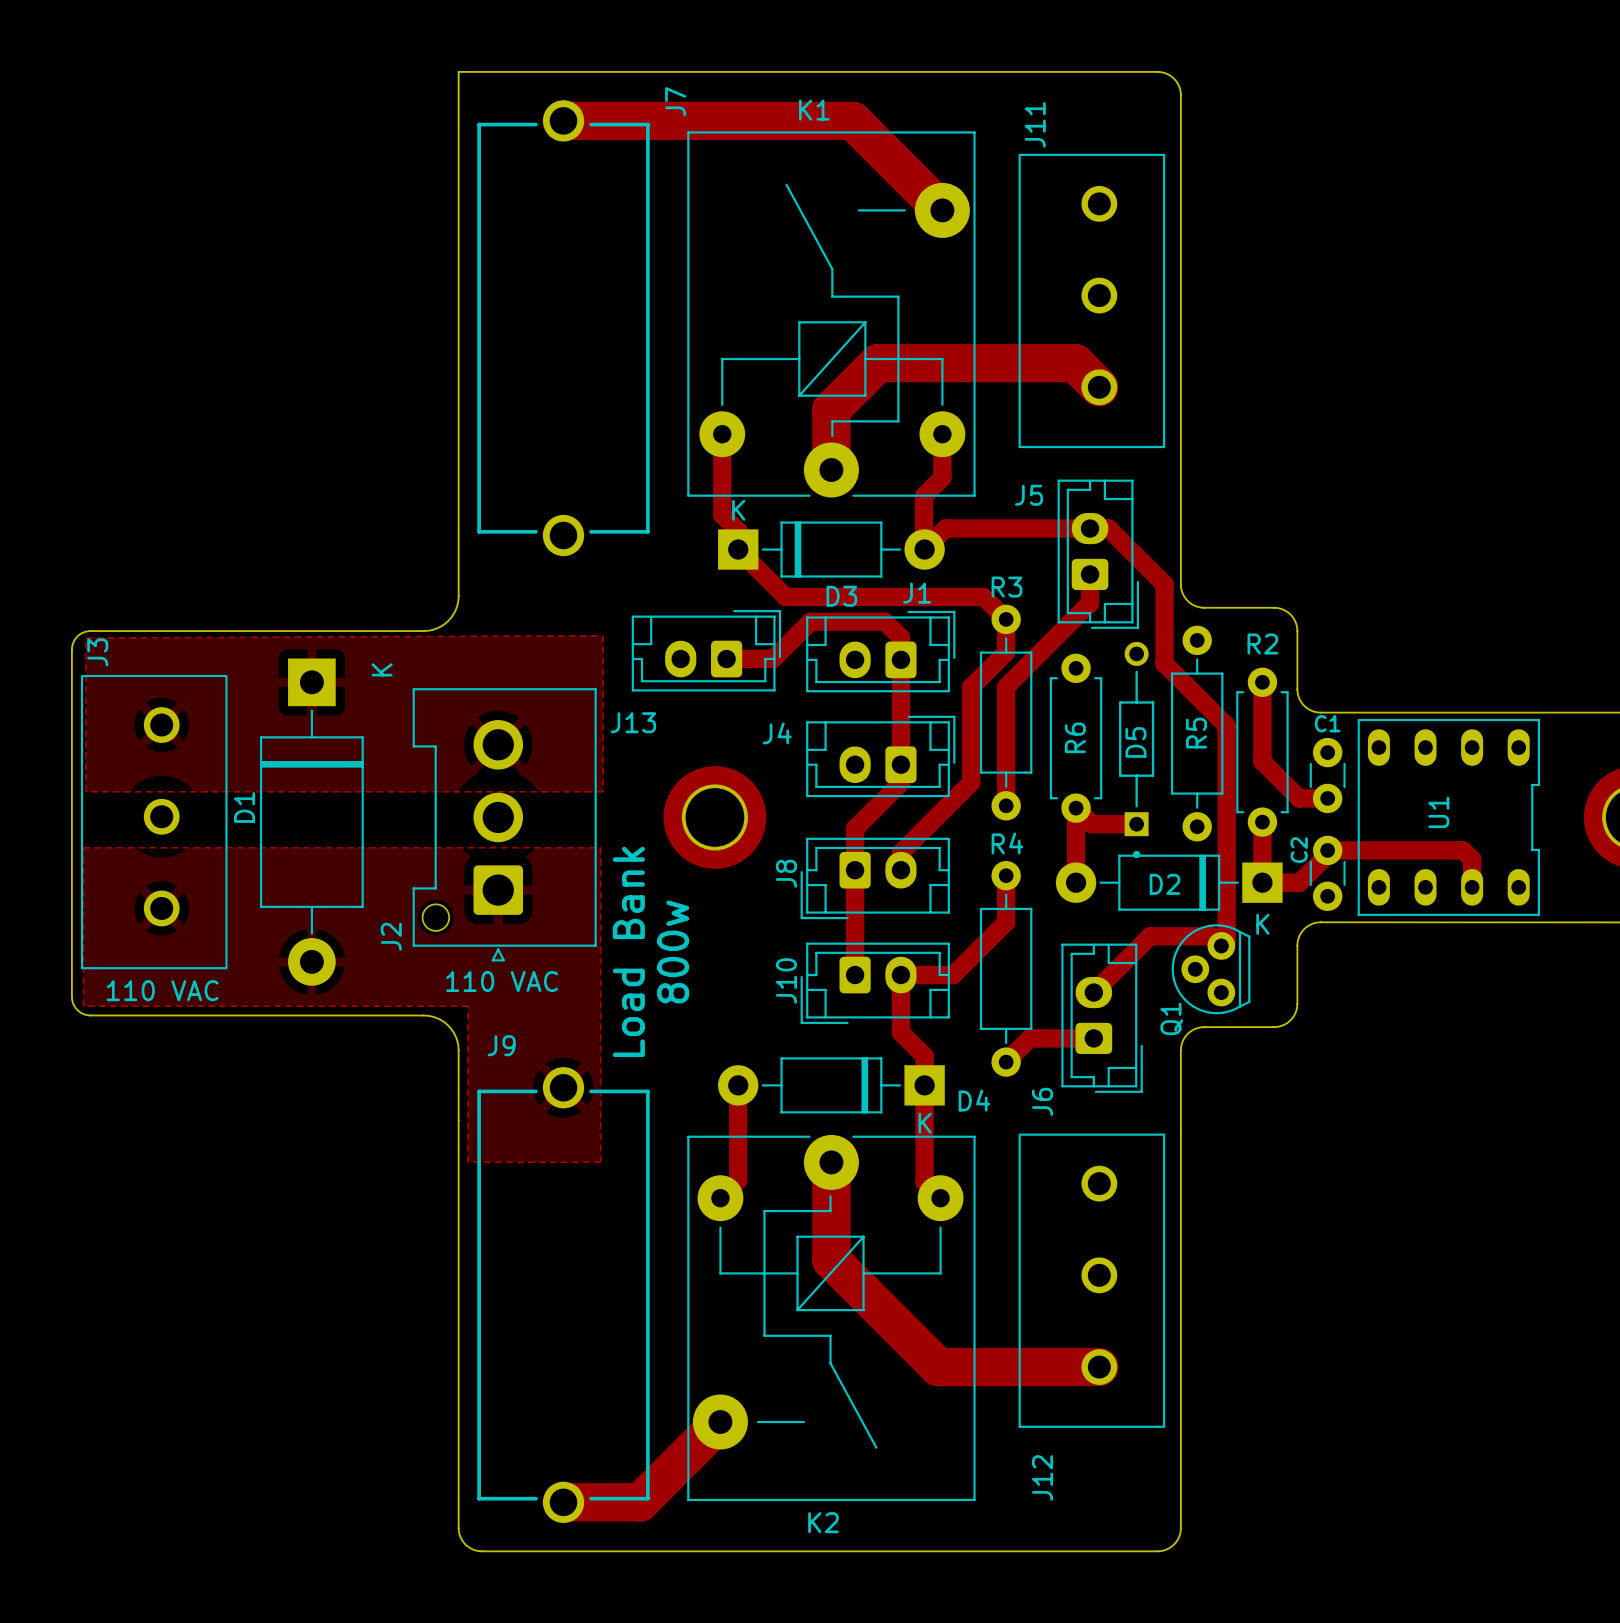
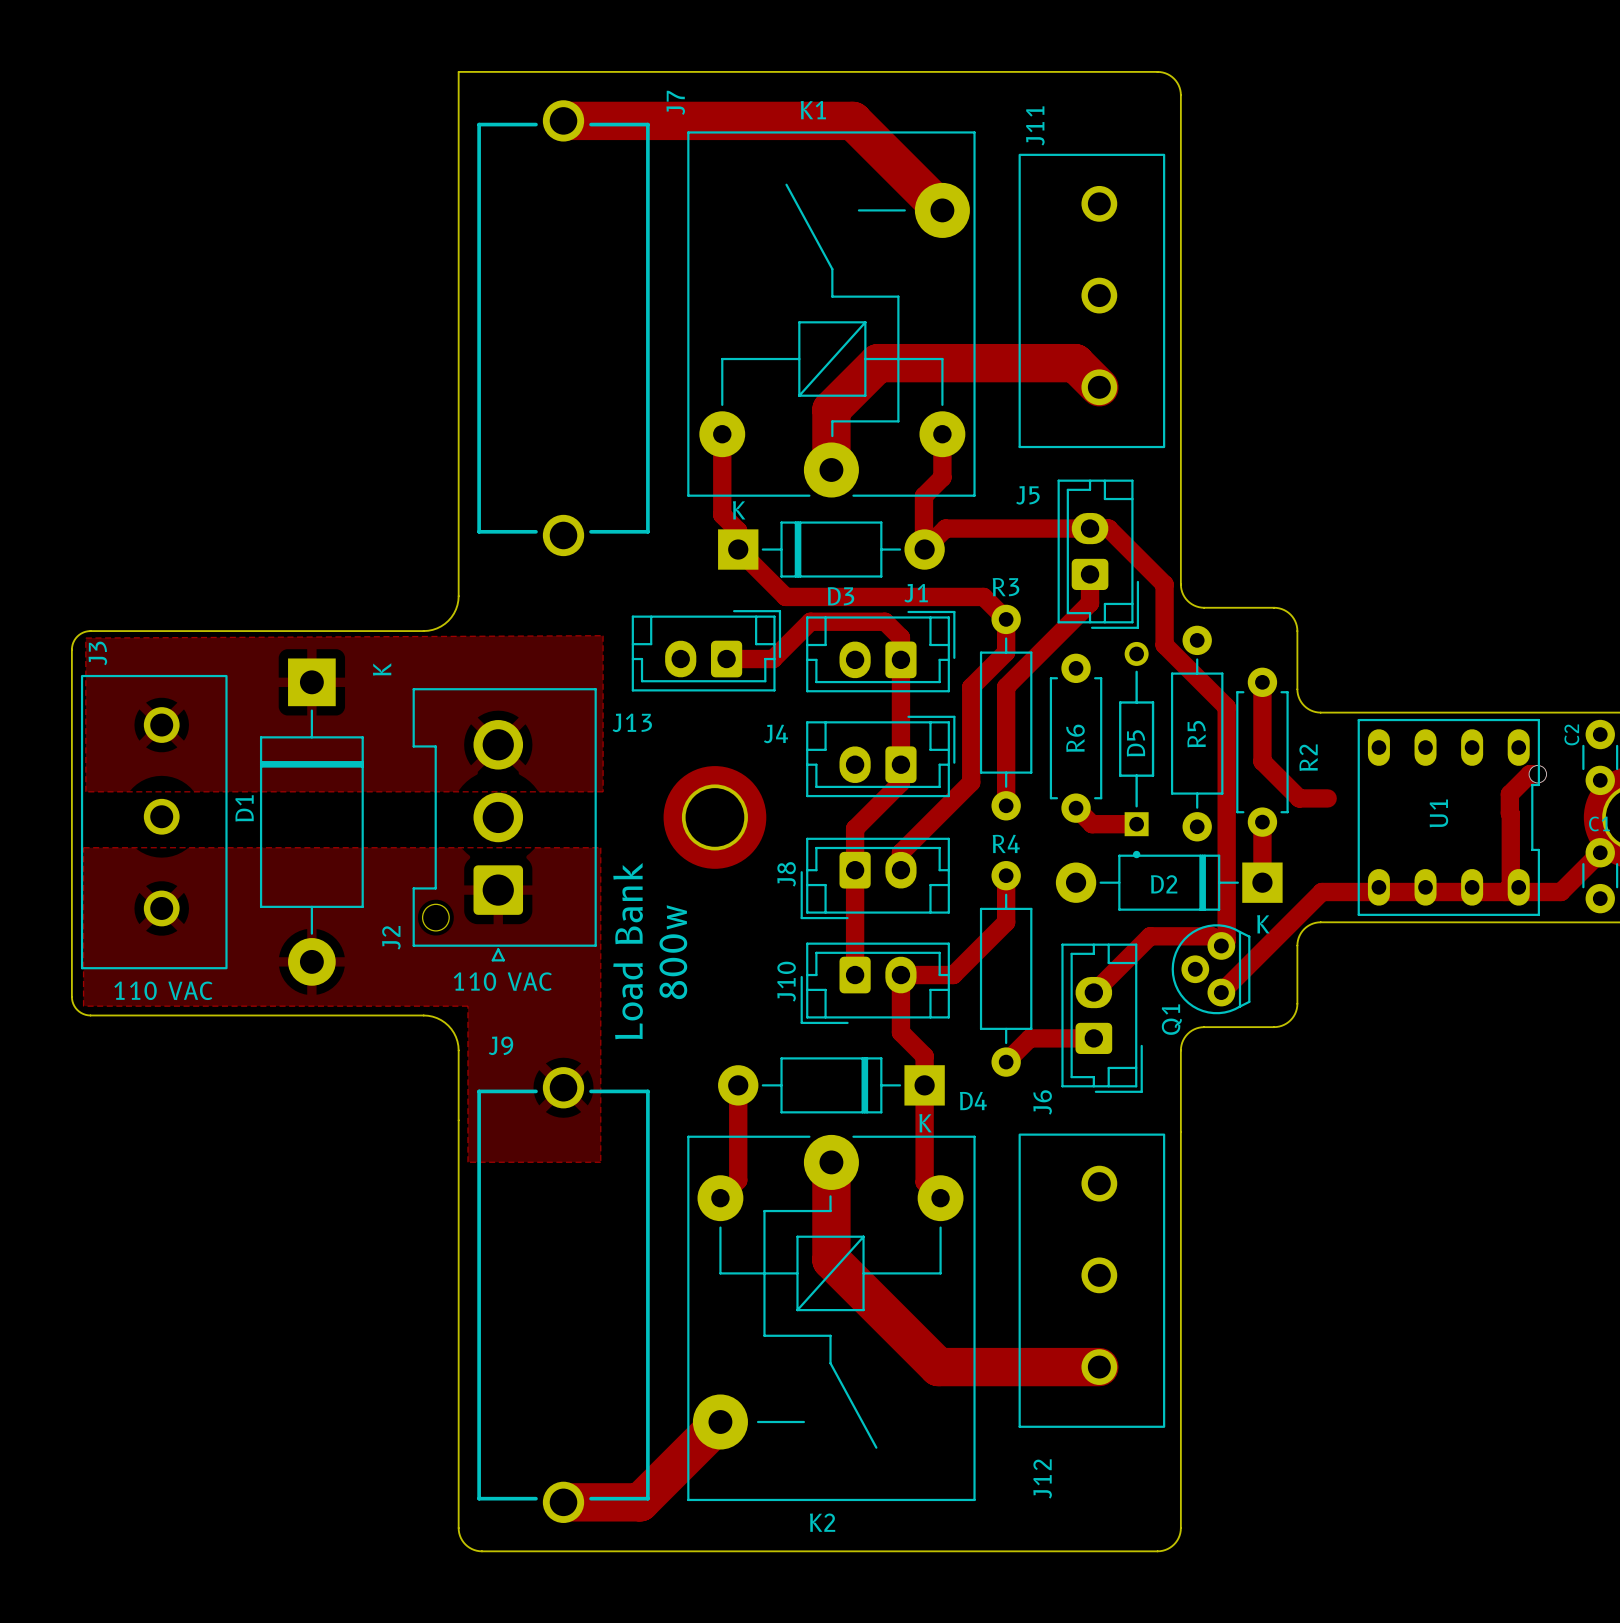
R2 name rotation: 0° (1262, 643) -> 90° counterclockwise (1308, 757)
R2 name position: R2 (1262, 643) -> R2 (1308, 757)
track: (1164, 645) (1164, 663) (1226, 725) -> (1164, 645) (1226, 707) (1226, 725)
track: none -> (1537, 774) (1529, 774) (1509, 794) (1510, 885) (1504, 892)
via: none -> (1537, 774)
C1 position: (1327, 775) -> (1600, 875)
track: (1076, 808) (1076, 882) -> none
track: none -> (1600, 852) (1561, 892) (1321, 892) (1221, 992)
C2 position: (1327, 873) -> (1600, 757)
track: (1262, 875) (1262, 882) (1299, 882) (1327, 854) (1327, 850) (1463, 850) (1472, 859) (1472, 887) -> none

